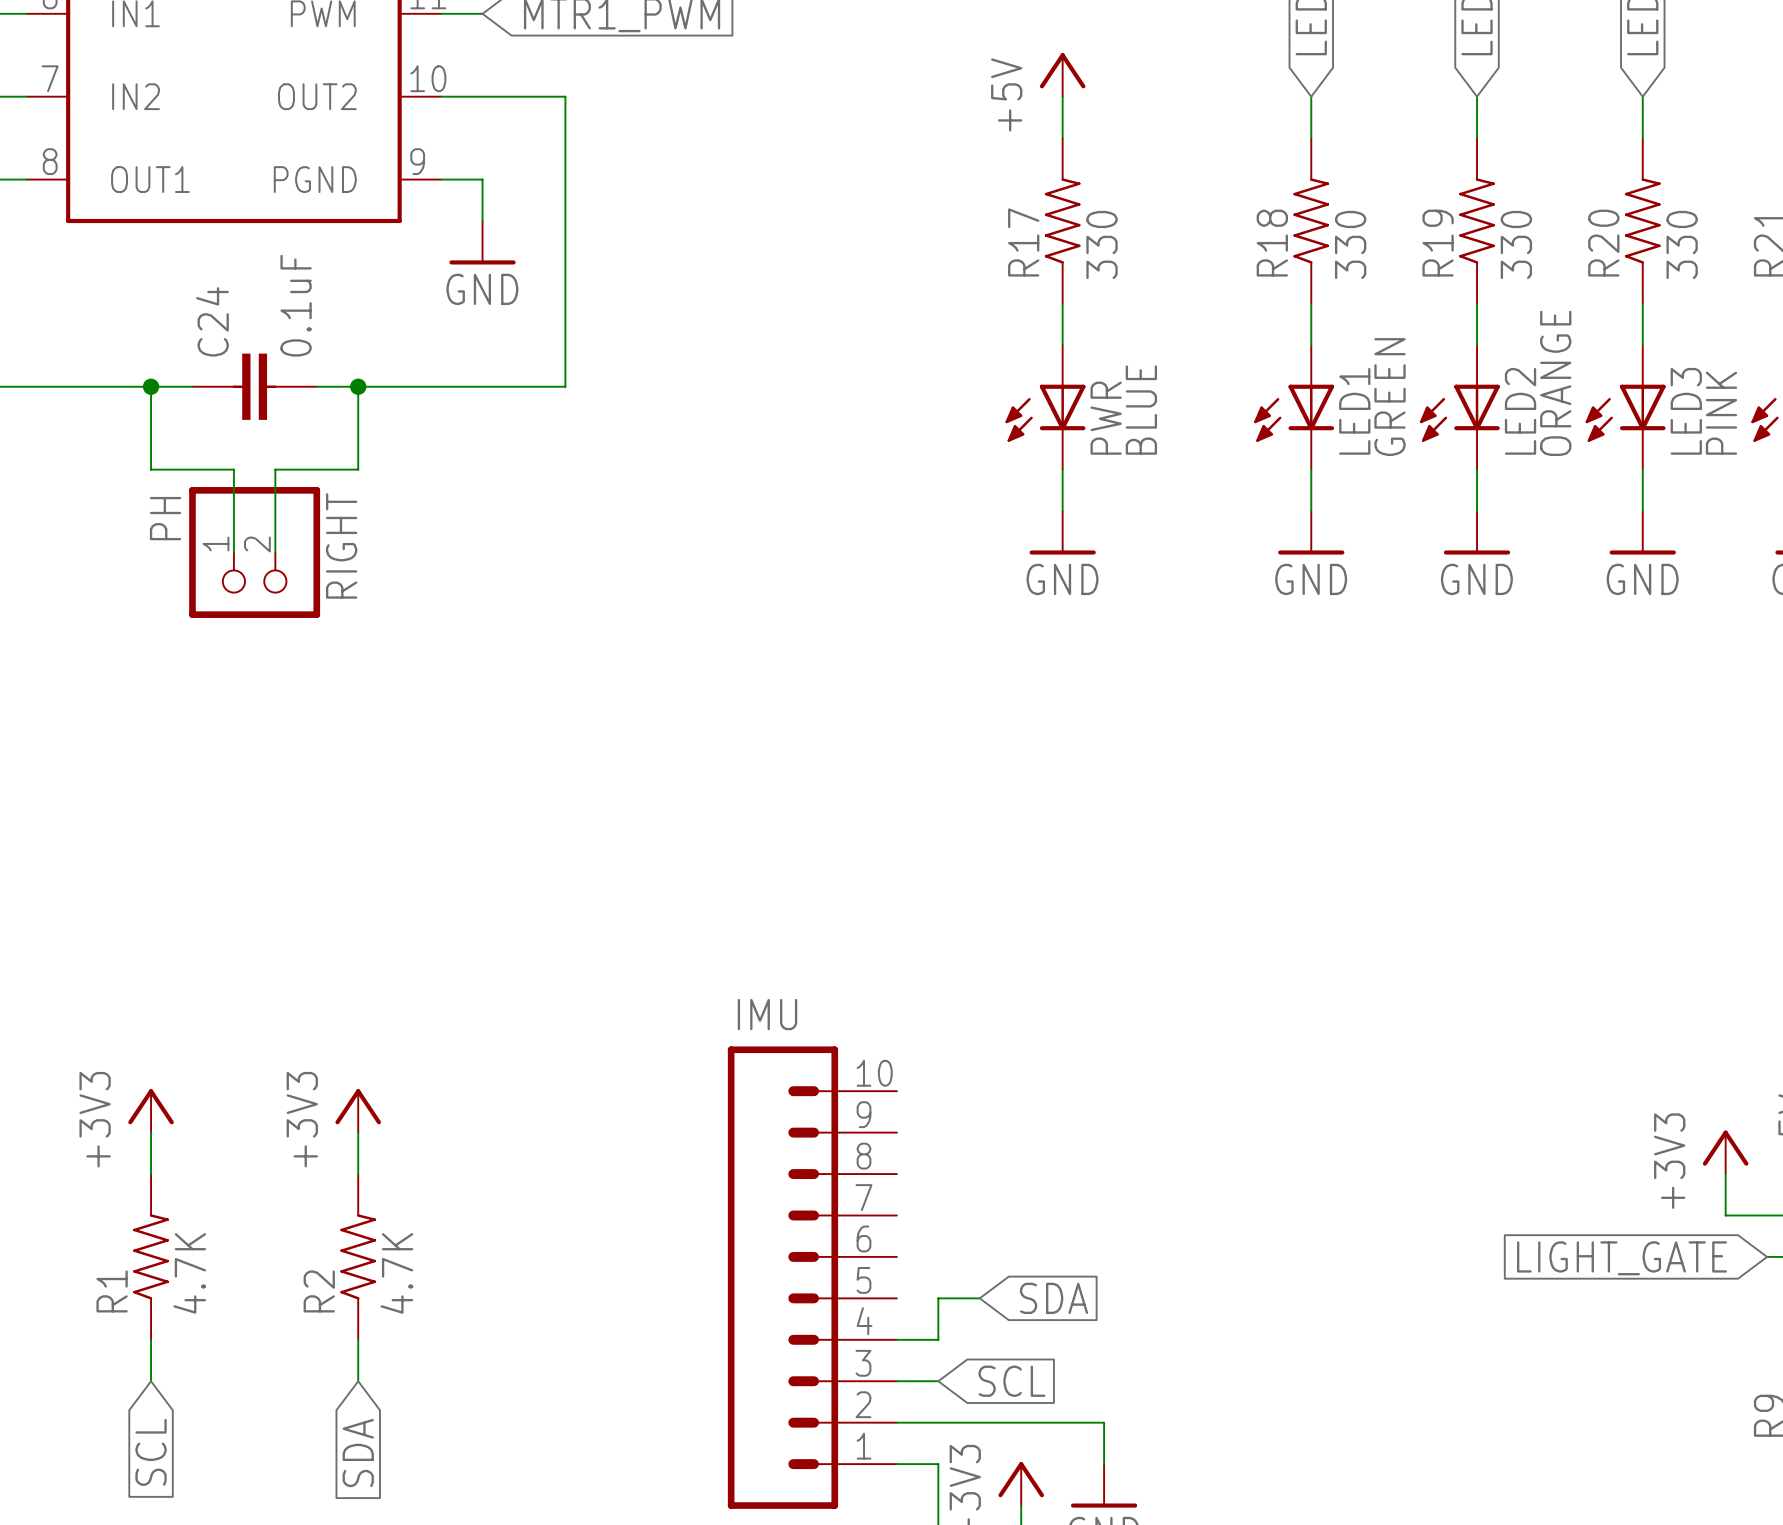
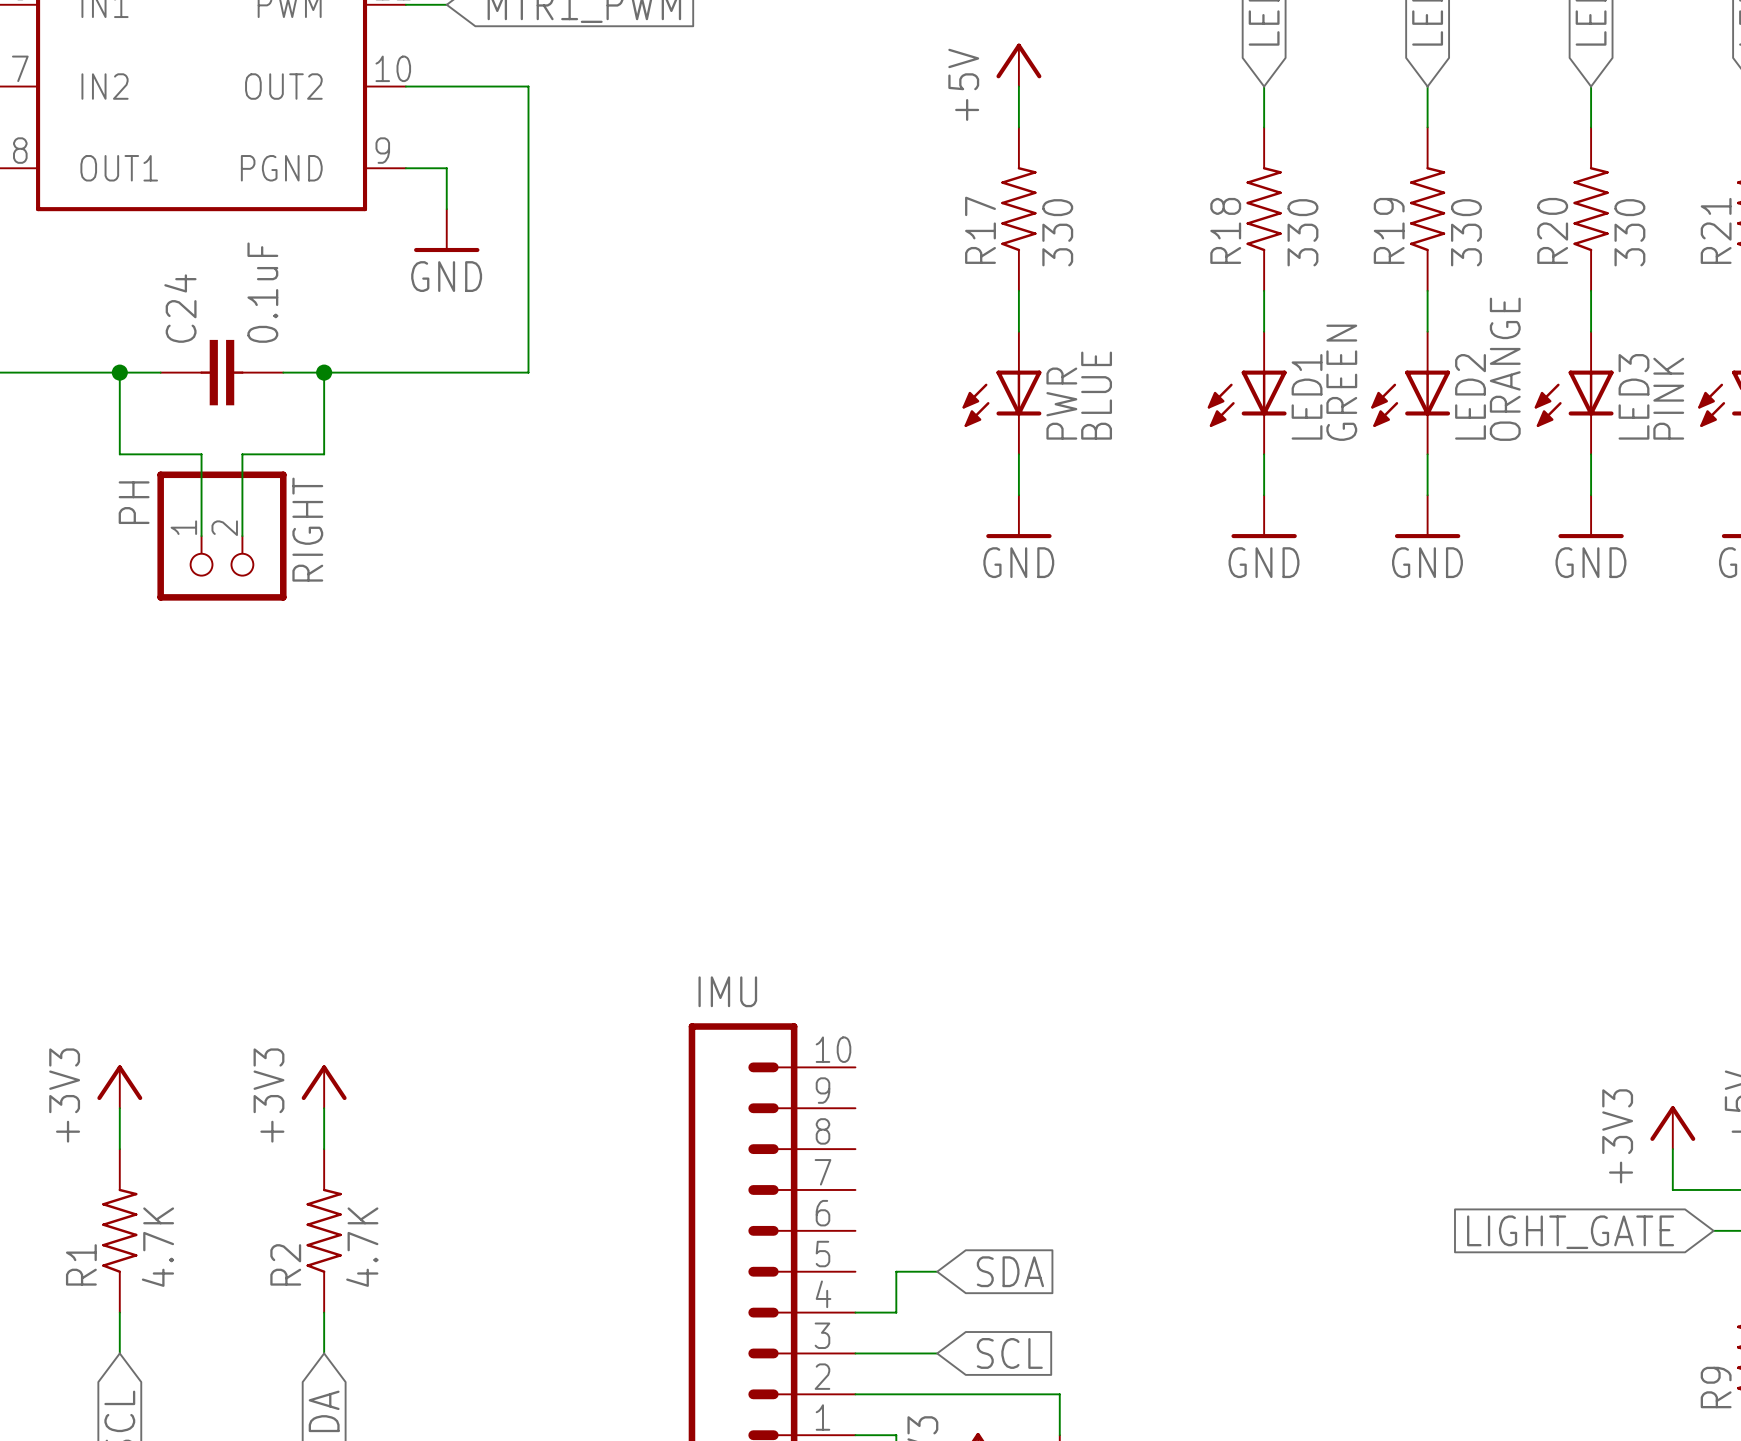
wire: none -> (896, 1353) (937, 1353)
global label position: SCL (1011, 1381) -> SCL (1009, 1353)

